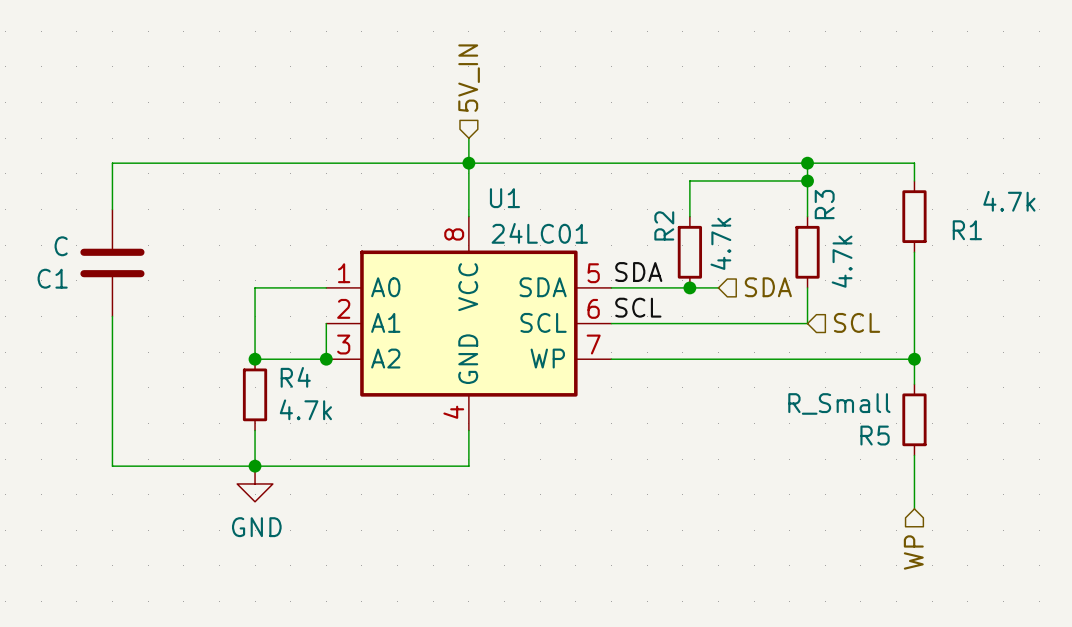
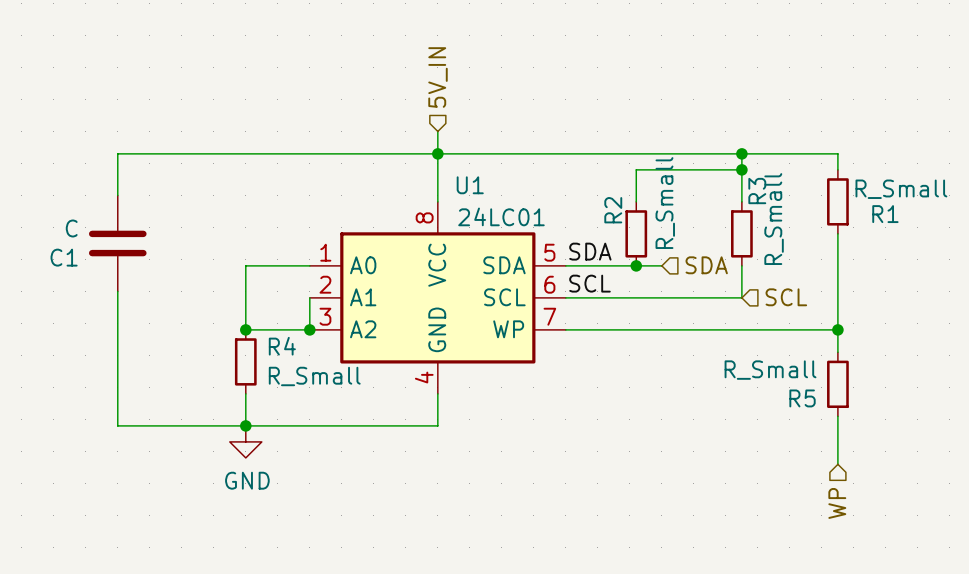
R1 value: 4.7k (1009, 201) -> R_Small (901, 189)
R2 value: 4.7k (720, 243) -> R_Small (665, 203)
R3 value: 4.7k (842, 261) -> R_Small (774, 219)
R4 value: 4.7k (305, 409) -> R_Small (314, 376)

